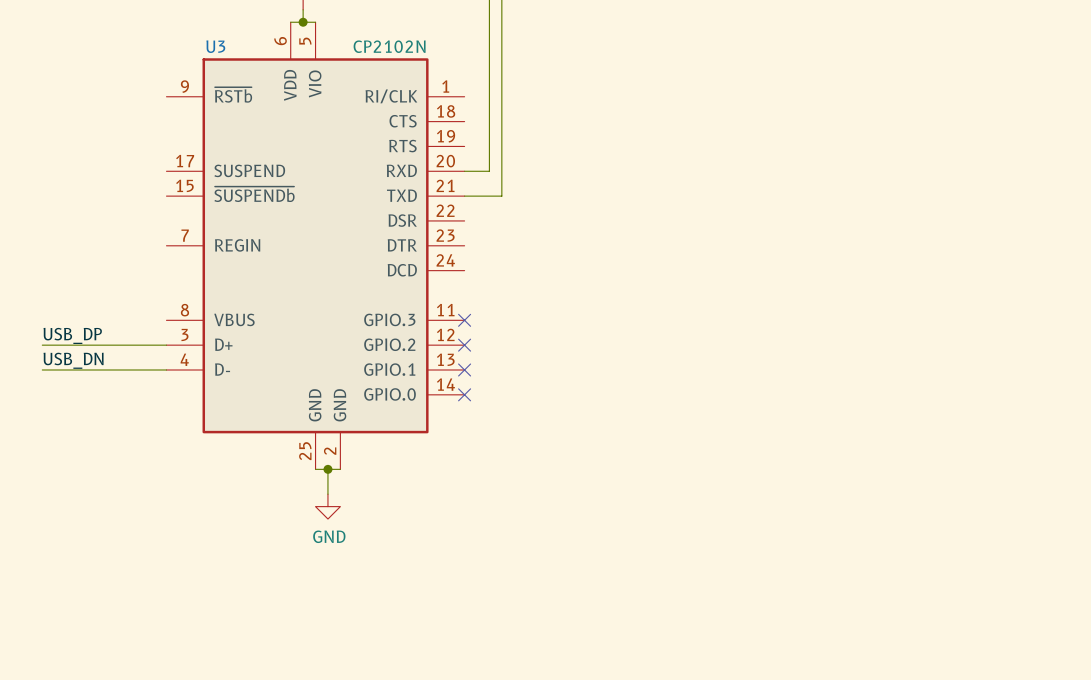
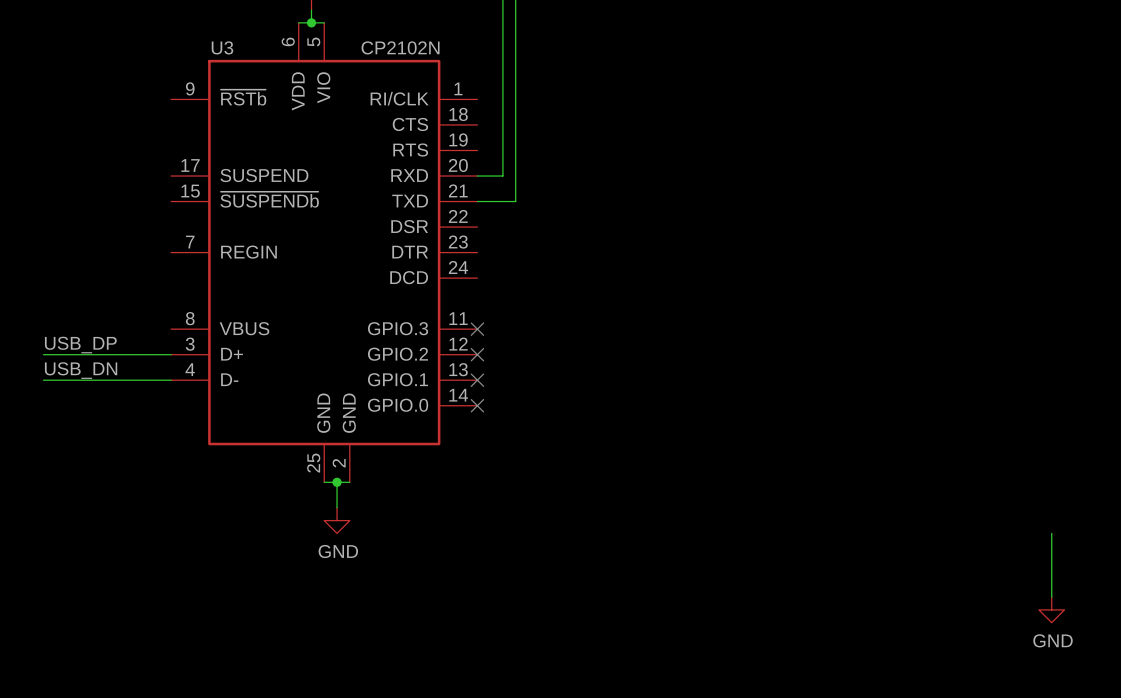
wire: none -> (1051, 533) (1051, 597)
power symbol: none -> GND (1051, 609)

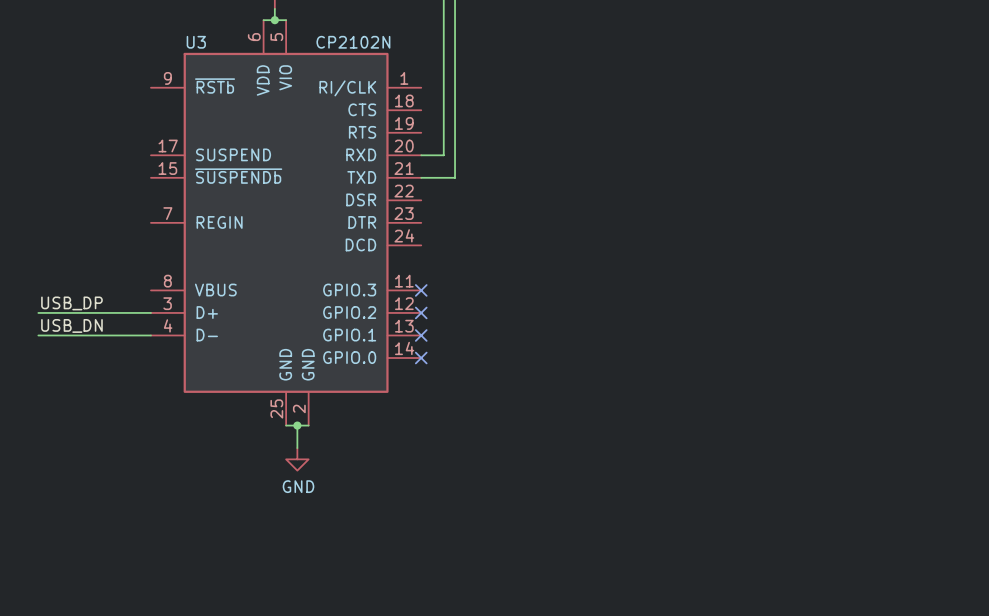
wire: (1051, 533) (1051, 597) -> none
power symbol: GND (1051, 609) -> none

